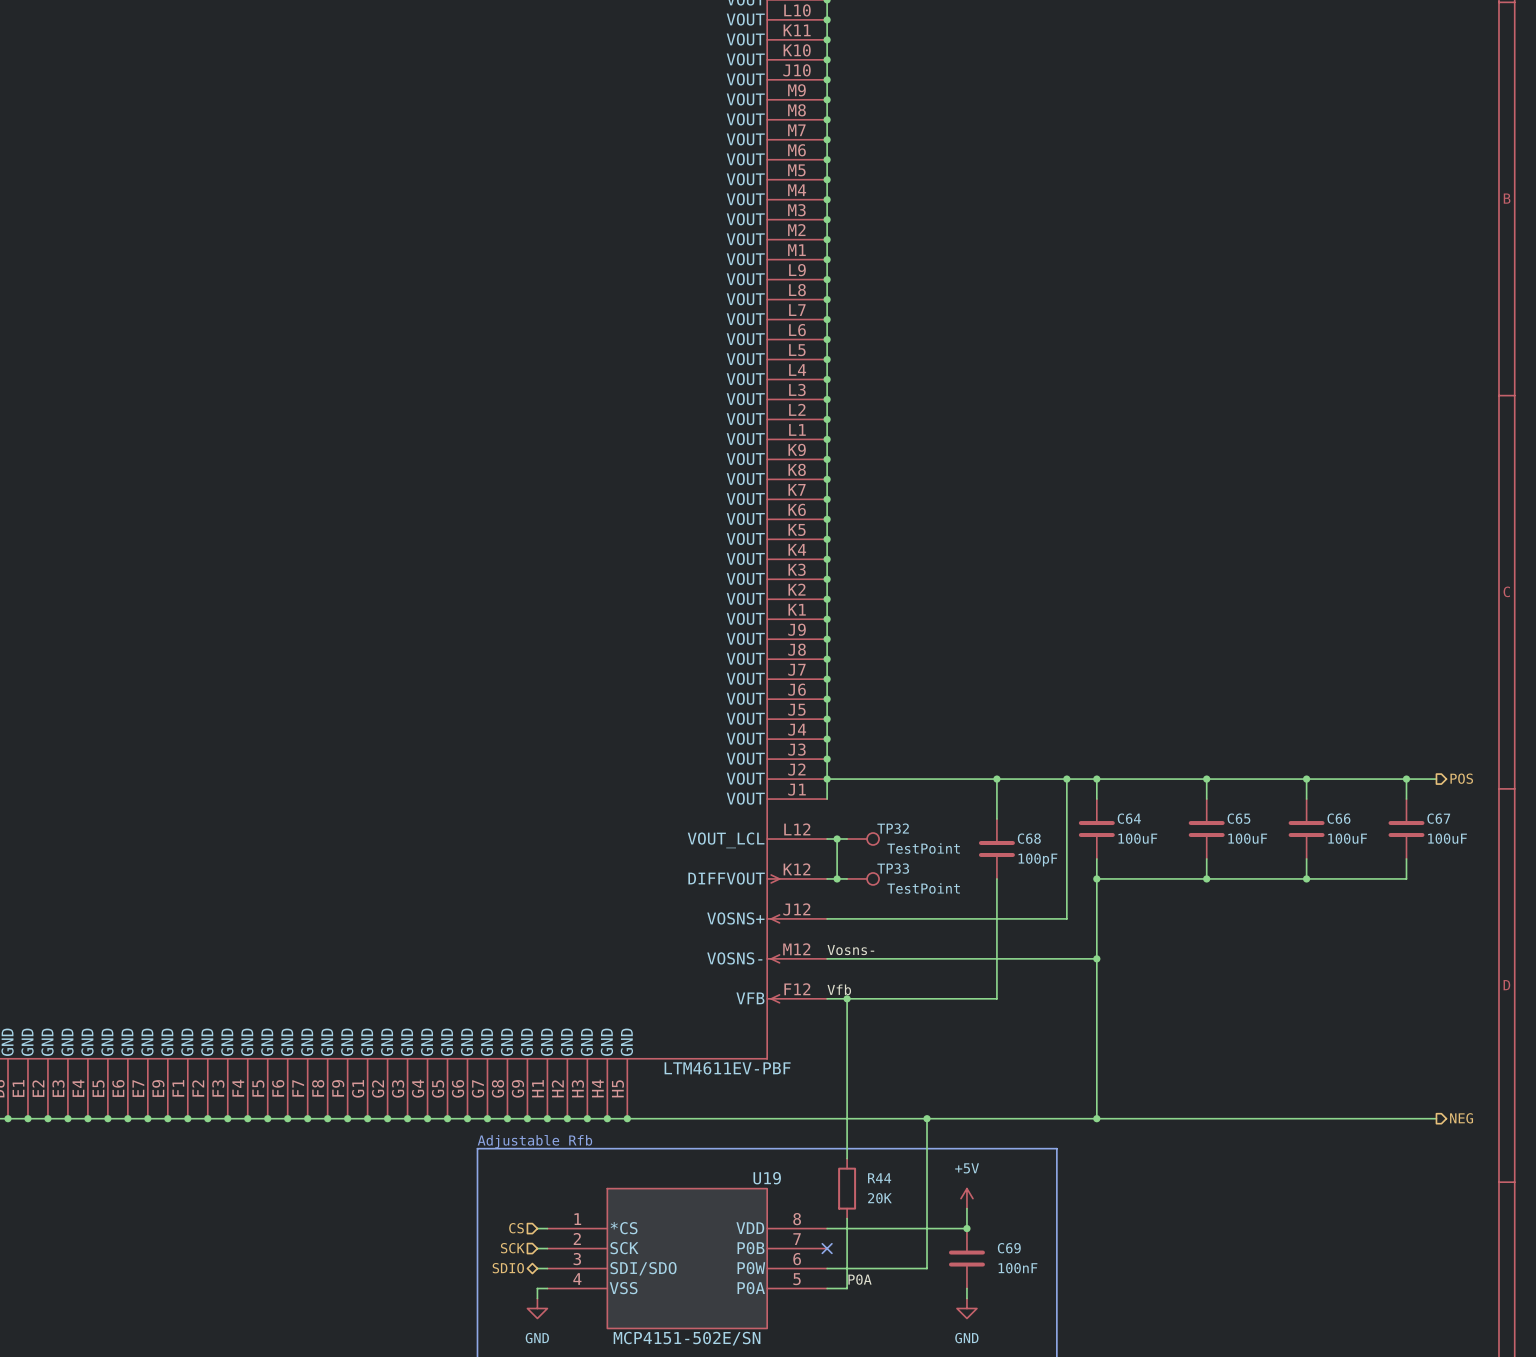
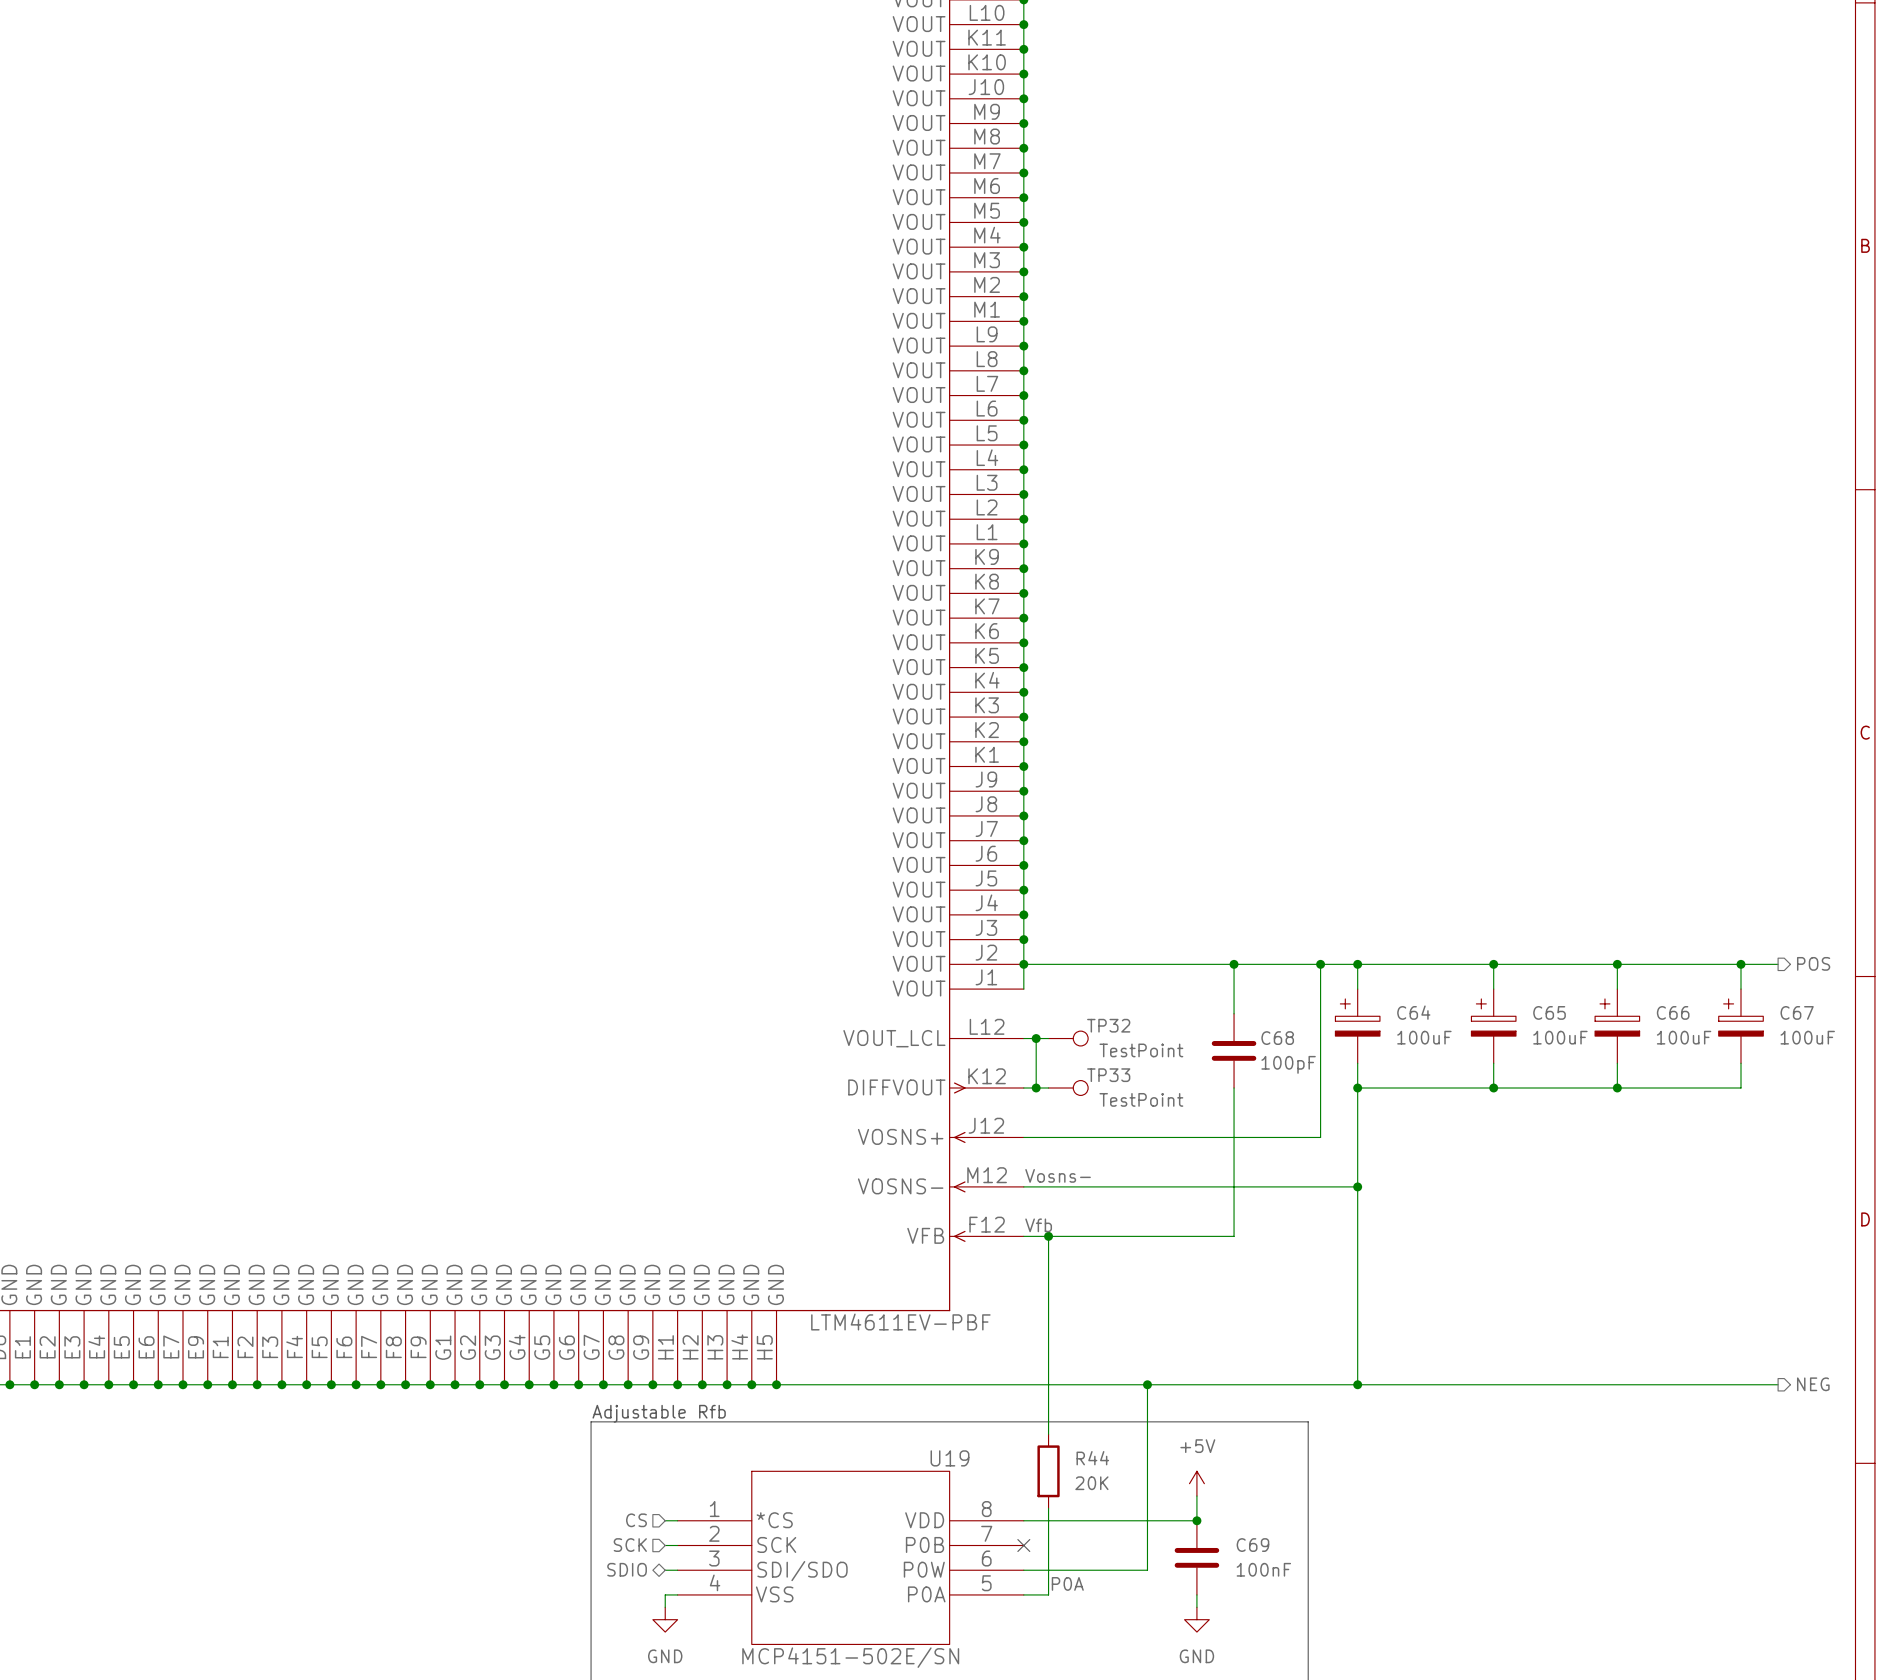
C64 symbol: [1078, 799, 1115, 859] -> [1335, 989, 1380, 1064]
C65 symbol: [1188, 799, 1225, 859] -> [1471, 989, 1516, 1064]
C66 symbol: [1288, 799, 1325, 859] -> [1595, 989, 1640, 1064]
C67 symbol: [1388, 799, 1425, 859] -> [1718, 989, 1764, 1064]

